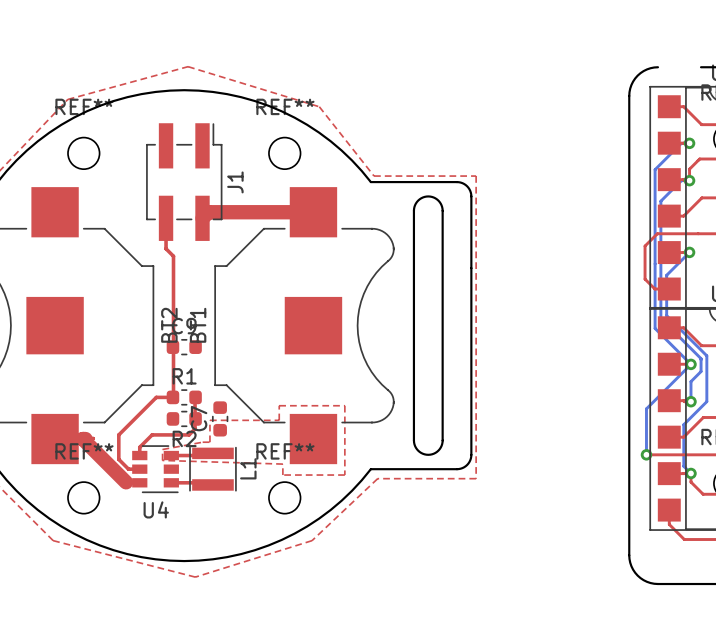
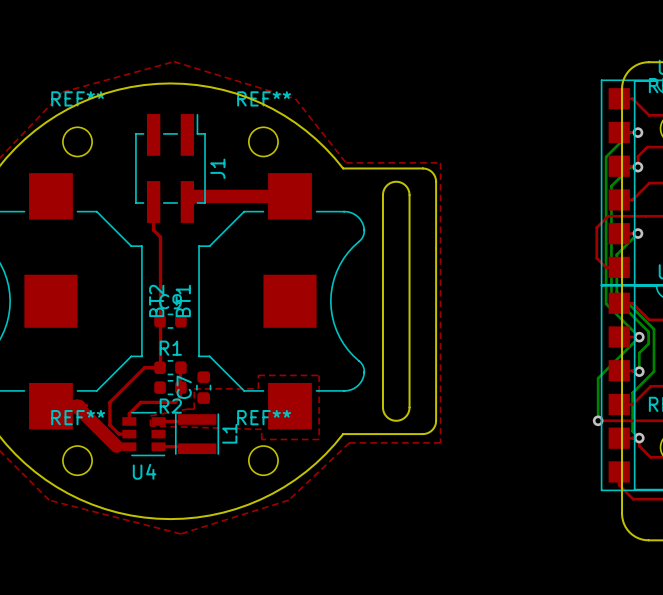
board edge: (657, 67) (646, 69) (637, 75) (631, 84) (629, 95) (629, 559) (635, 572) (646, 581) (657, 584) (701, 584) -> (648, 62) (638, 64) (629, 69) (624, 78) (622, 88) (622, 513) (624, 523) (629, 532) (638, 538) (648, 540)

